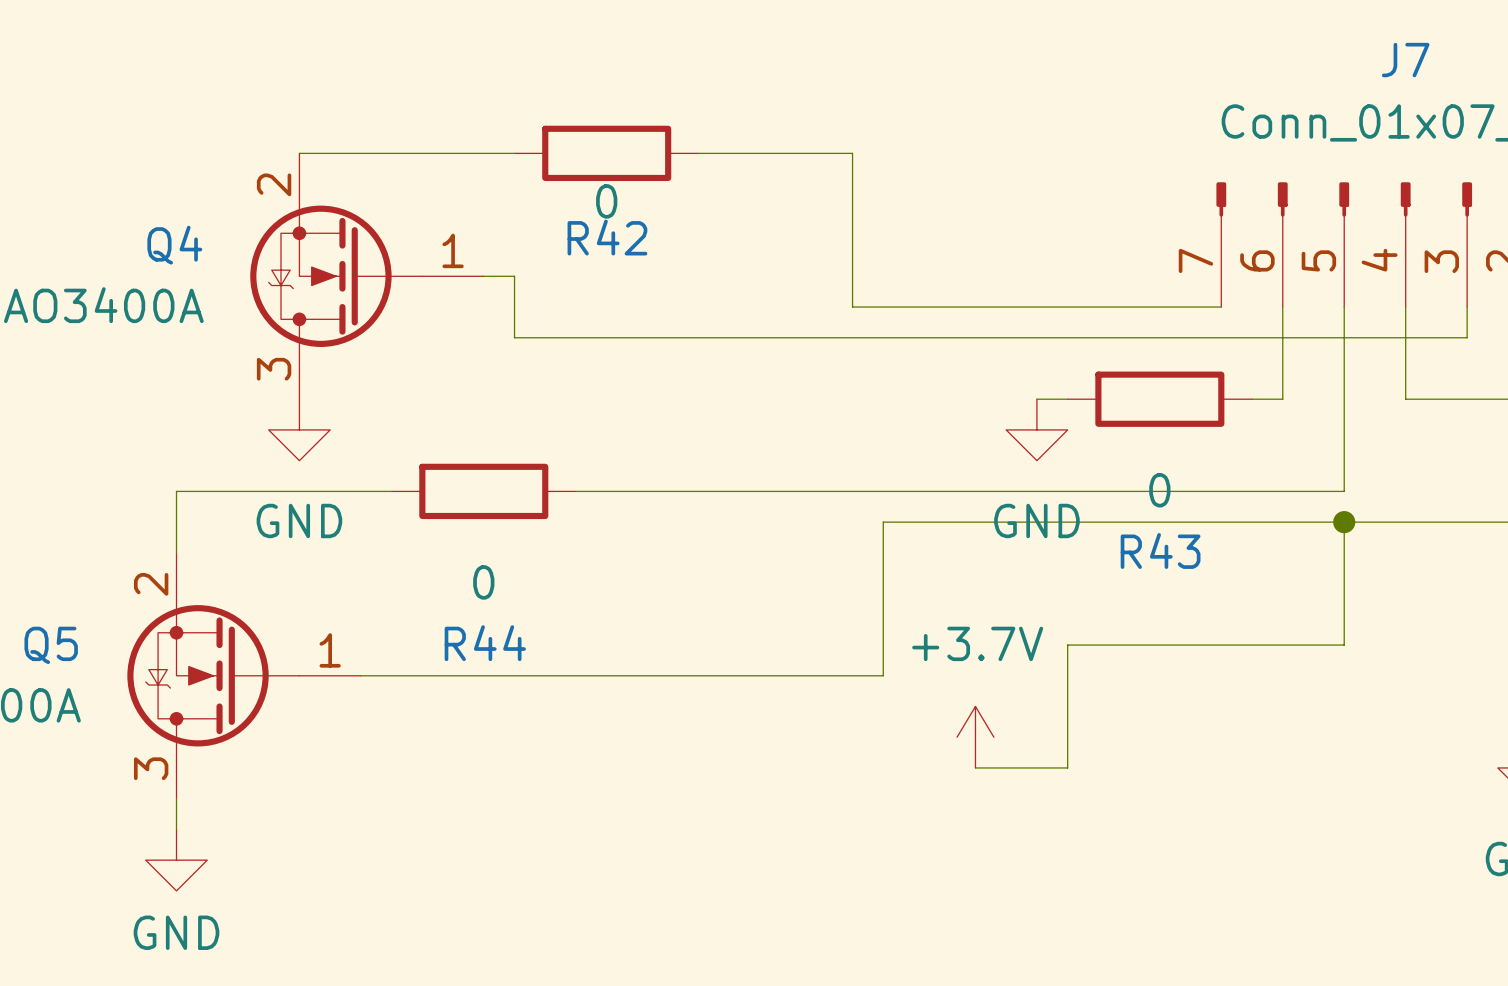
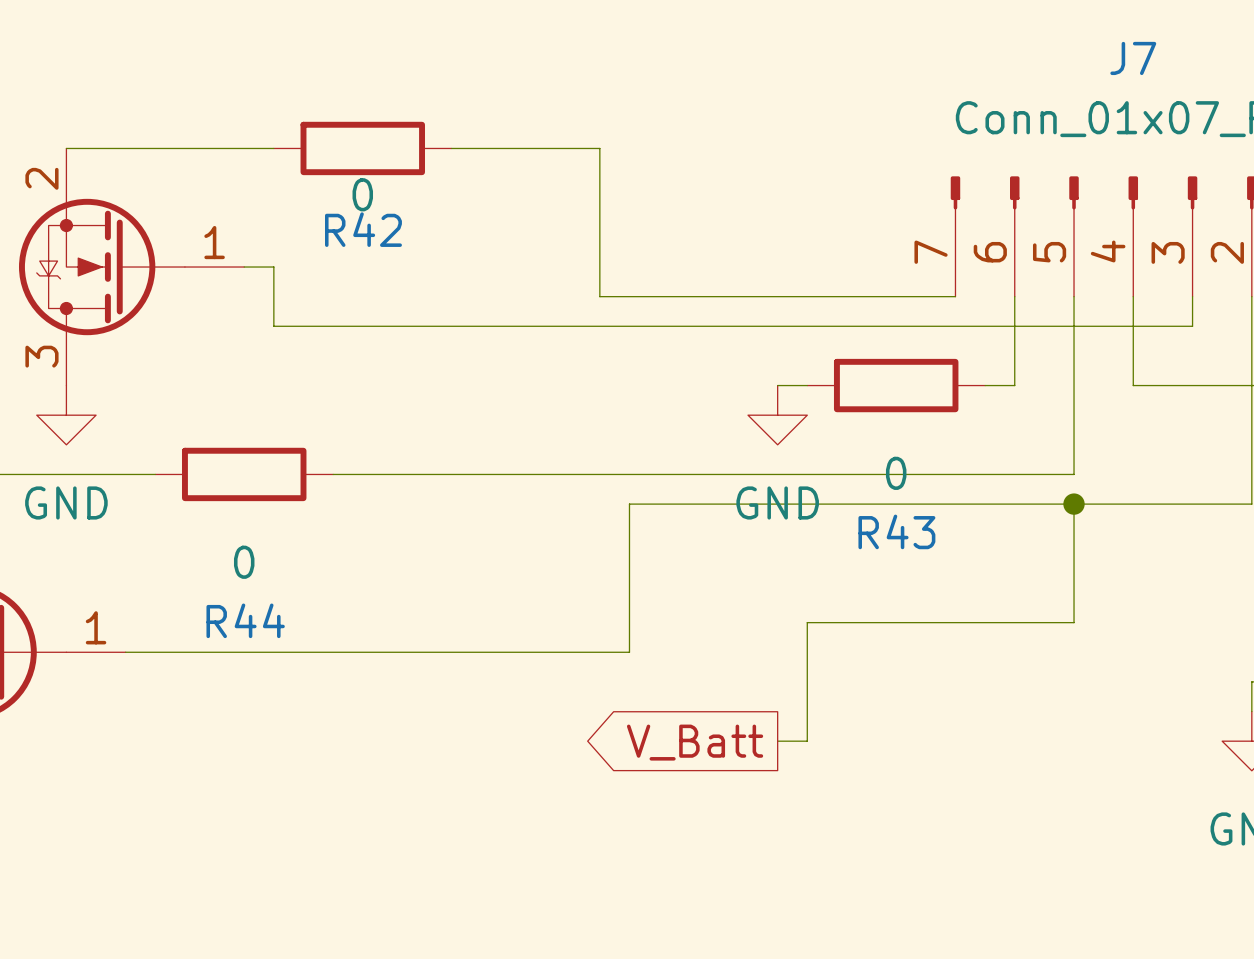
power symbol: +3.7V (975, 737) -> none
wire: (975, 767) (1036, 767) -> none
global label: none -> V_Batt (695, 742)

